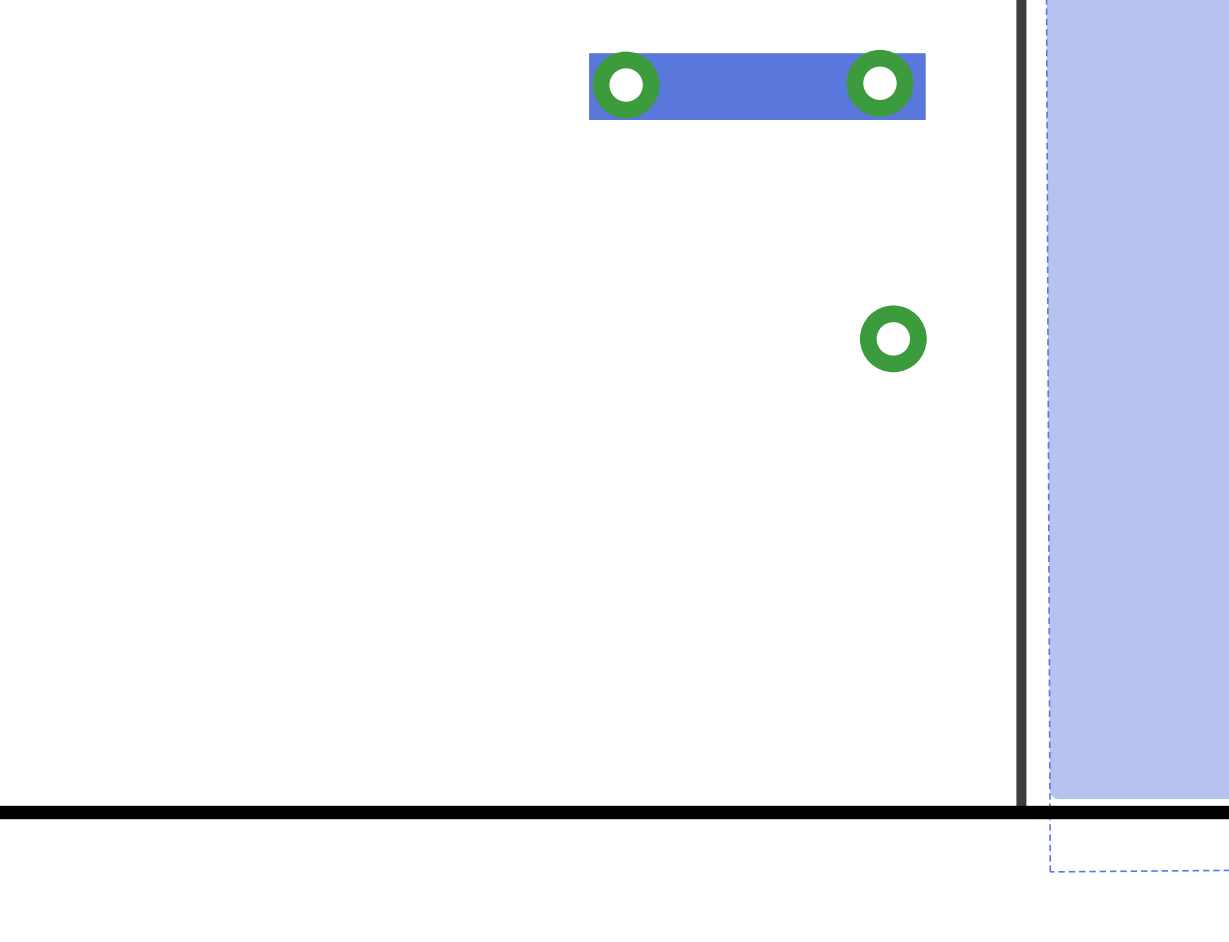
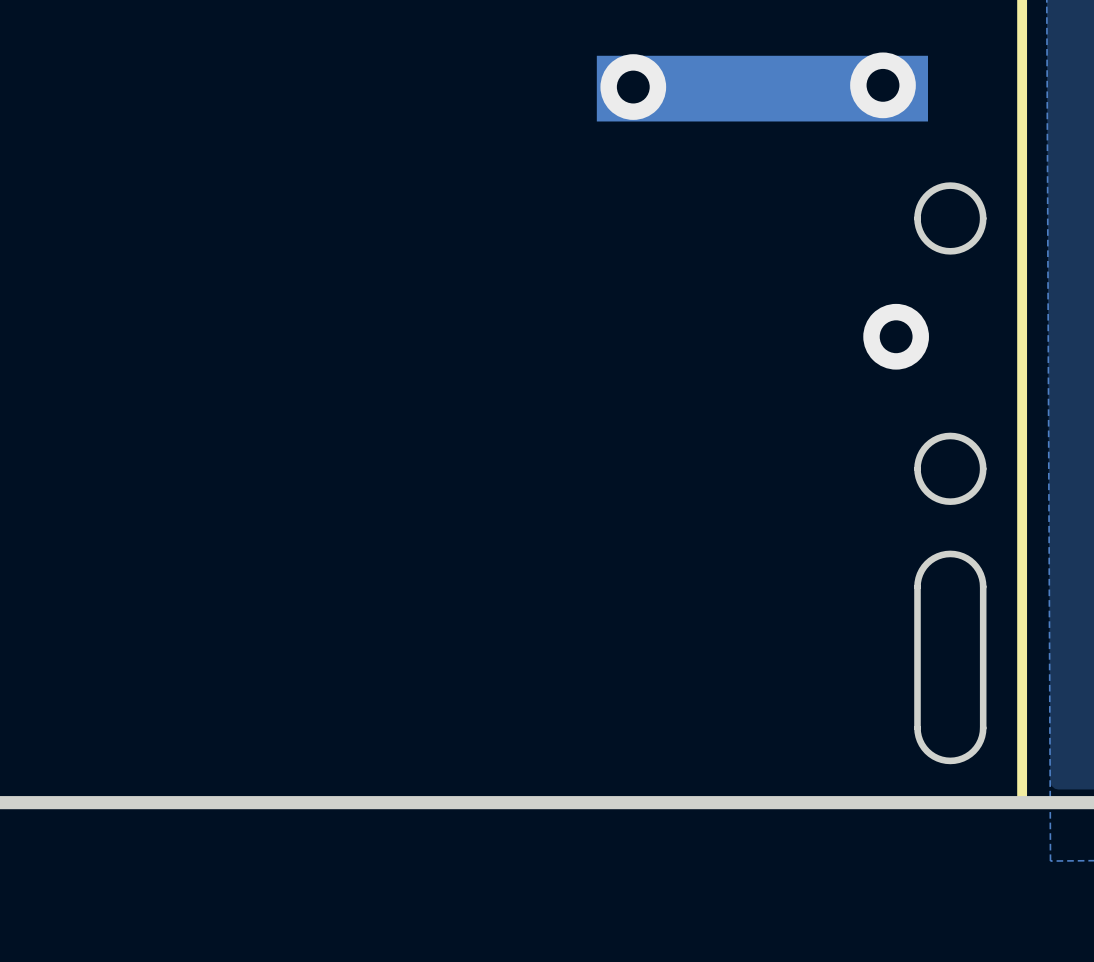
board edge: none -> (983, 218) (980, 231) (973, 241) (962, 248) (950, 251) (937, 248) (927, 241) (919, 231) (917, 218) (921, 203) (928, 193) (938, 187) (950, 185) (965, 189) (974, 196) (981, 206) (983, 218)
board edge: none -> (983, 468) (980, 456) (973, 445) (962, 438) (950, 435) (937, 438) (927, 445) (919, 456) (917, 468) (919, 481) (927, 492) (937, 499) (950, 501) (962, 499) (973, 492) (980, 481) (983, 468)
board edge: none -> (983, 586) (982, 736) (976, 748) (966, 756) (954, 760) (941, 759) (930, 754) (924, 748) (917, 732) (918, 578) (924, 566) (933, 558) (946, 554) (954, 554) (966, 558) (976, 566) (982, 578) (983, 586)

